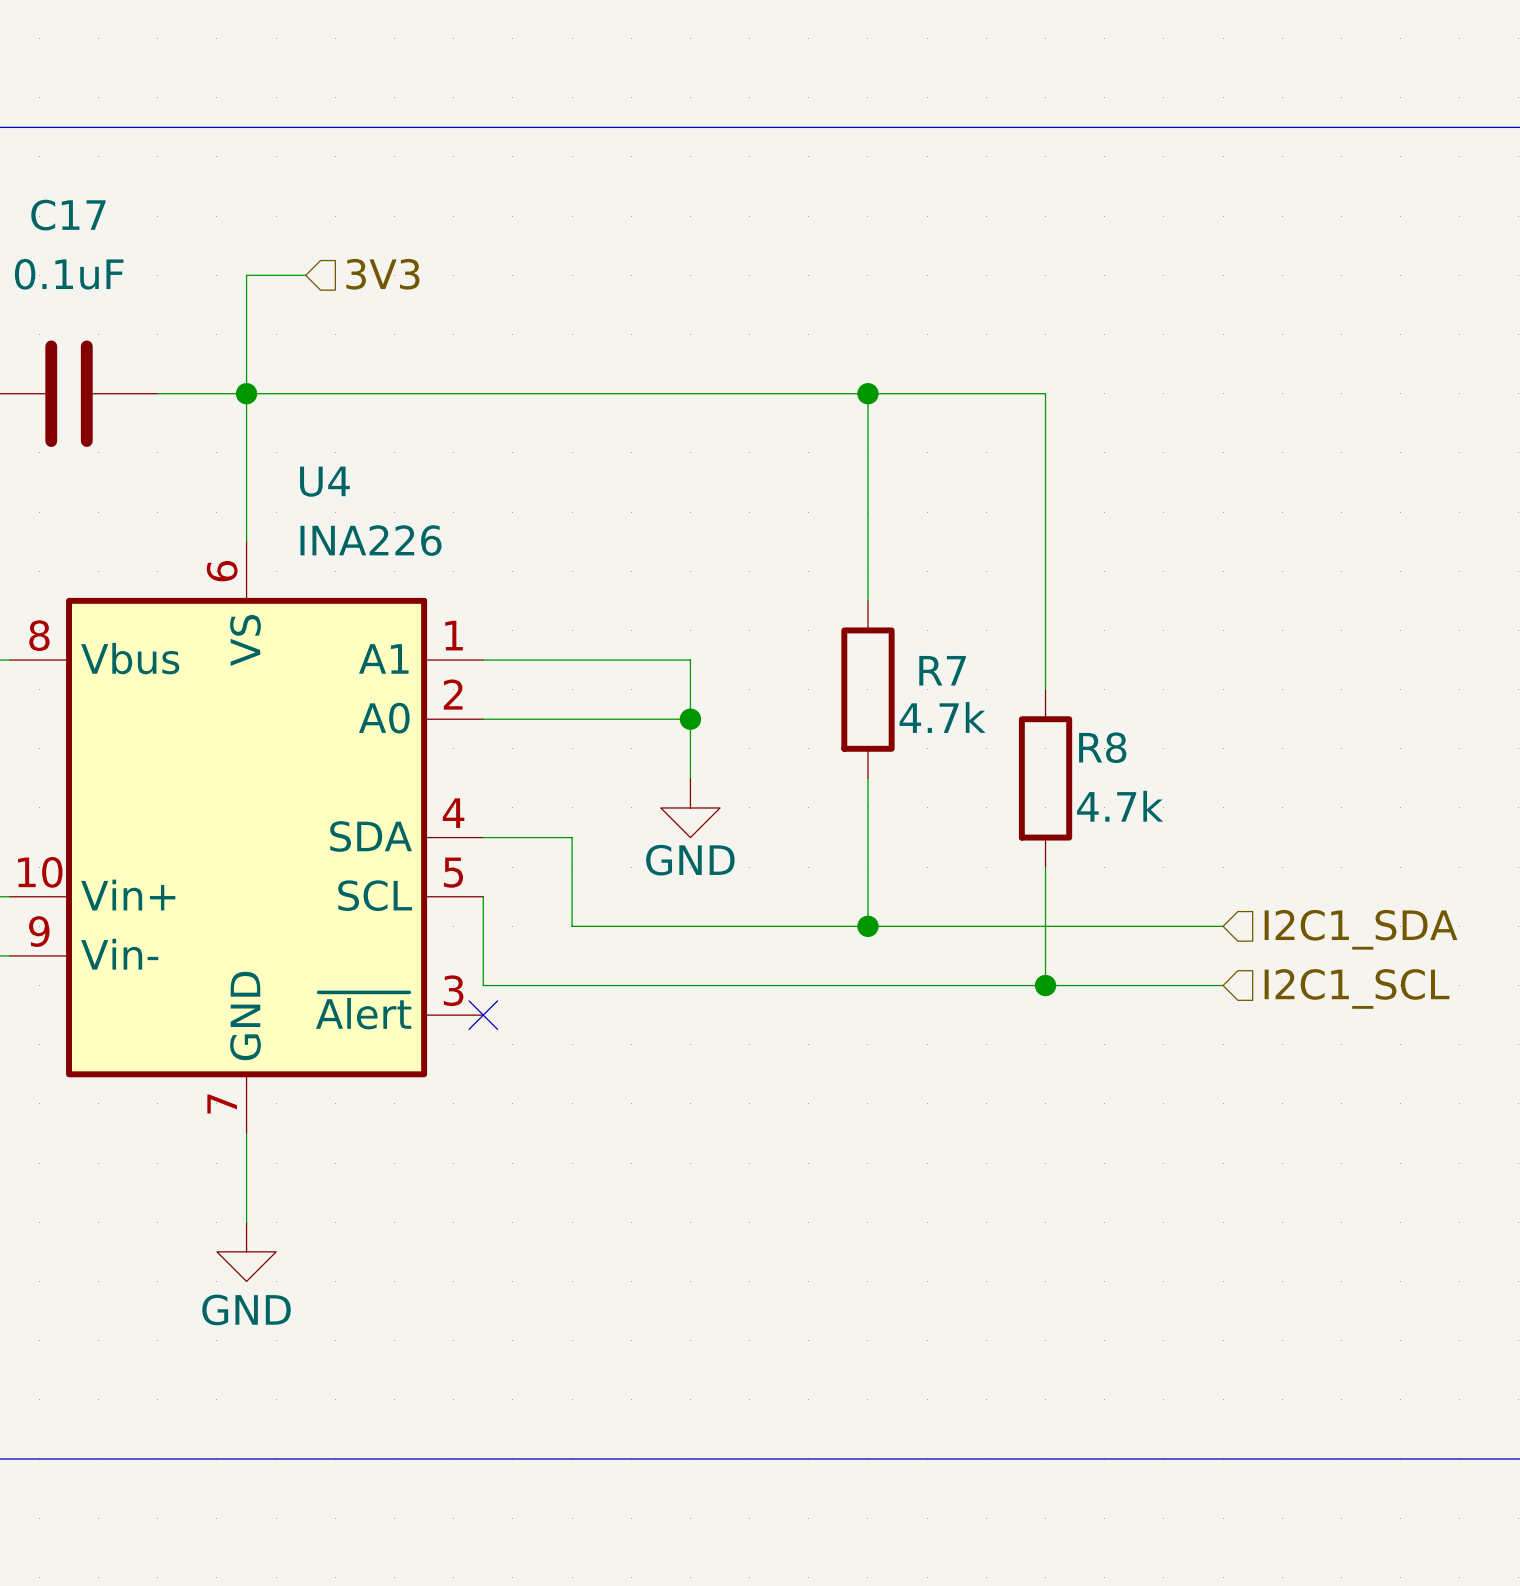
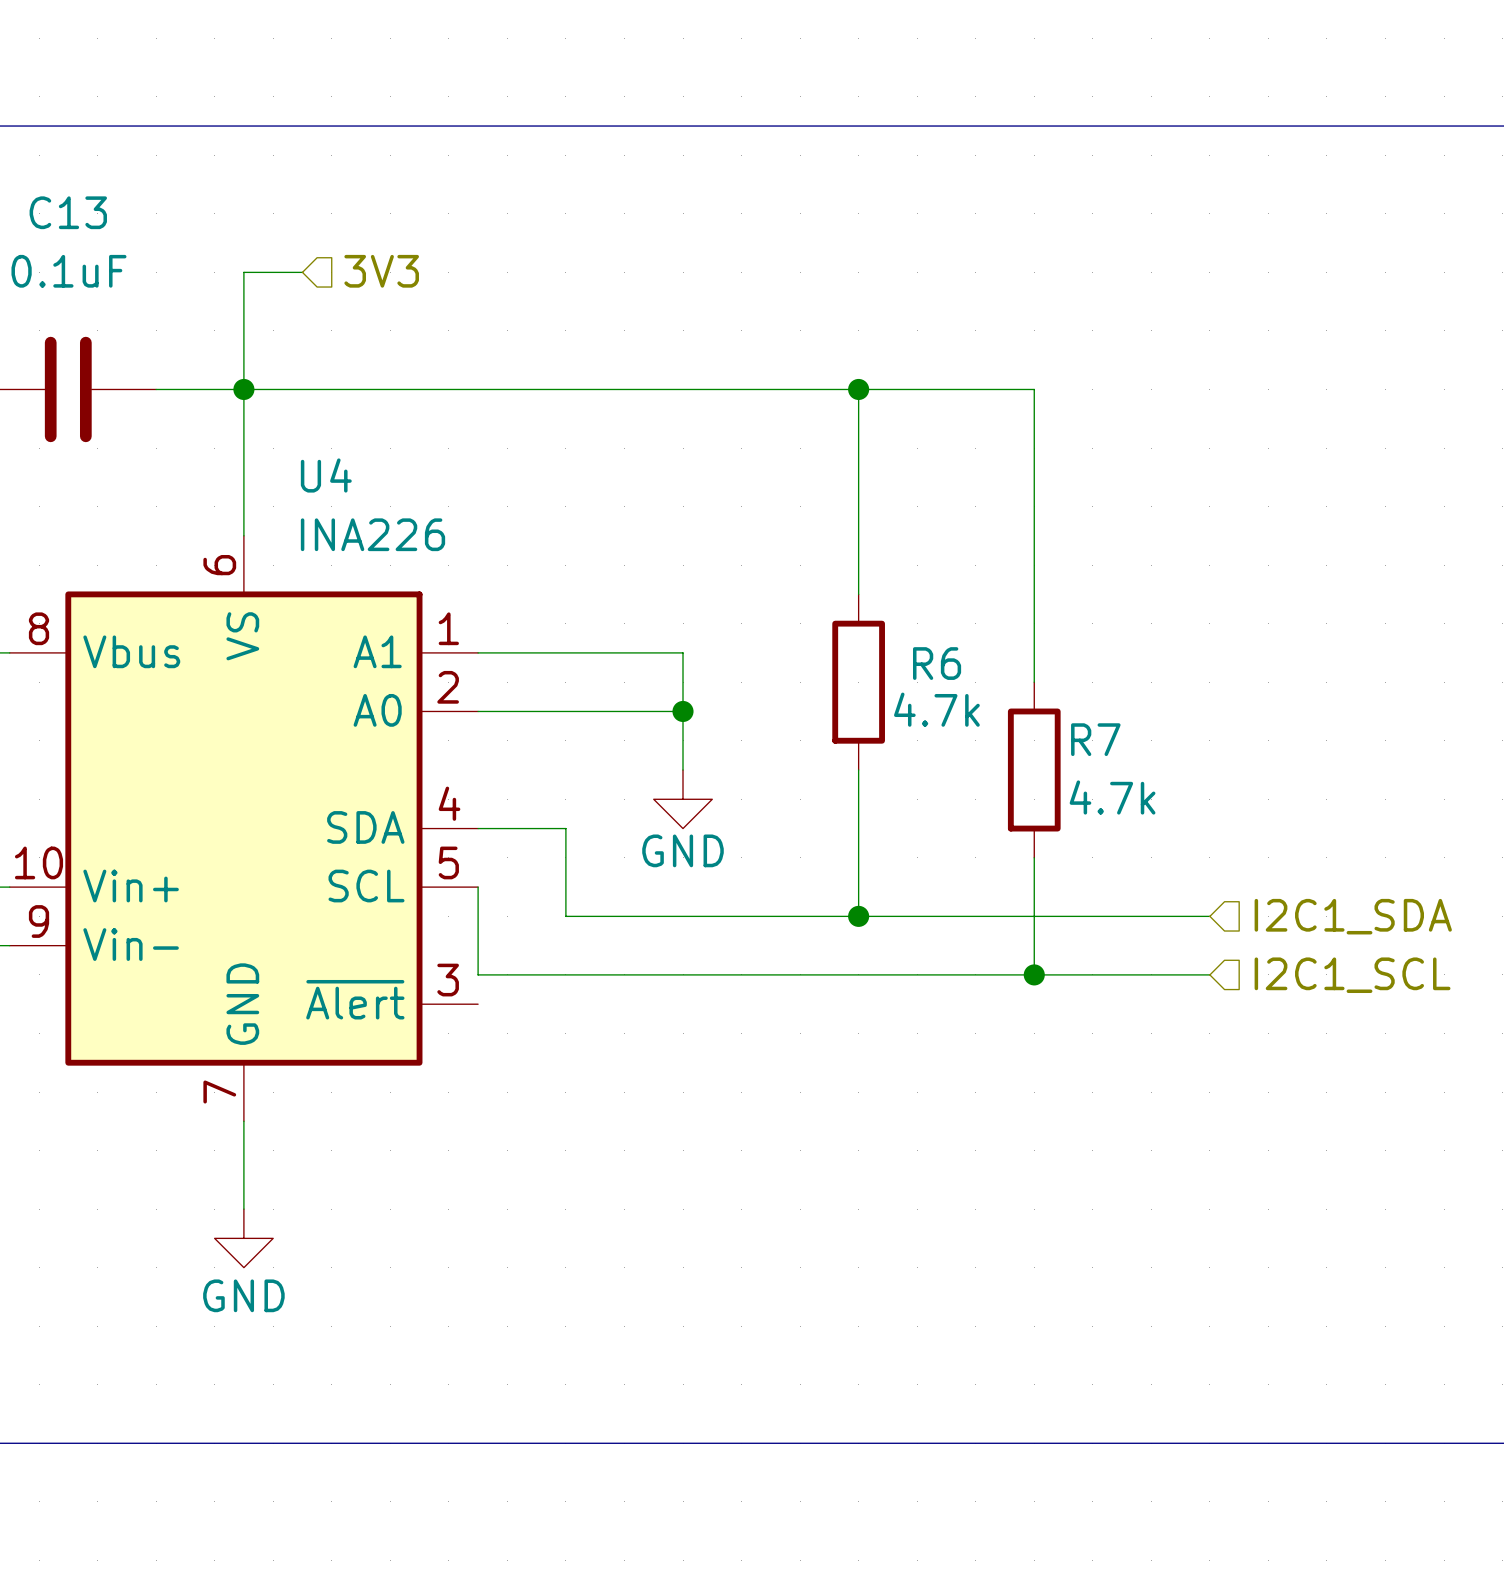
C17 name: C17 (68, 215) -> C13 (68, 212)
R7 name: R7 (942, 670) -> R6 (937, 663)
R8 name: R8 (1102, 747) -> R7 (1095, 739)
no-connect mark: (483, 1015) -> none

